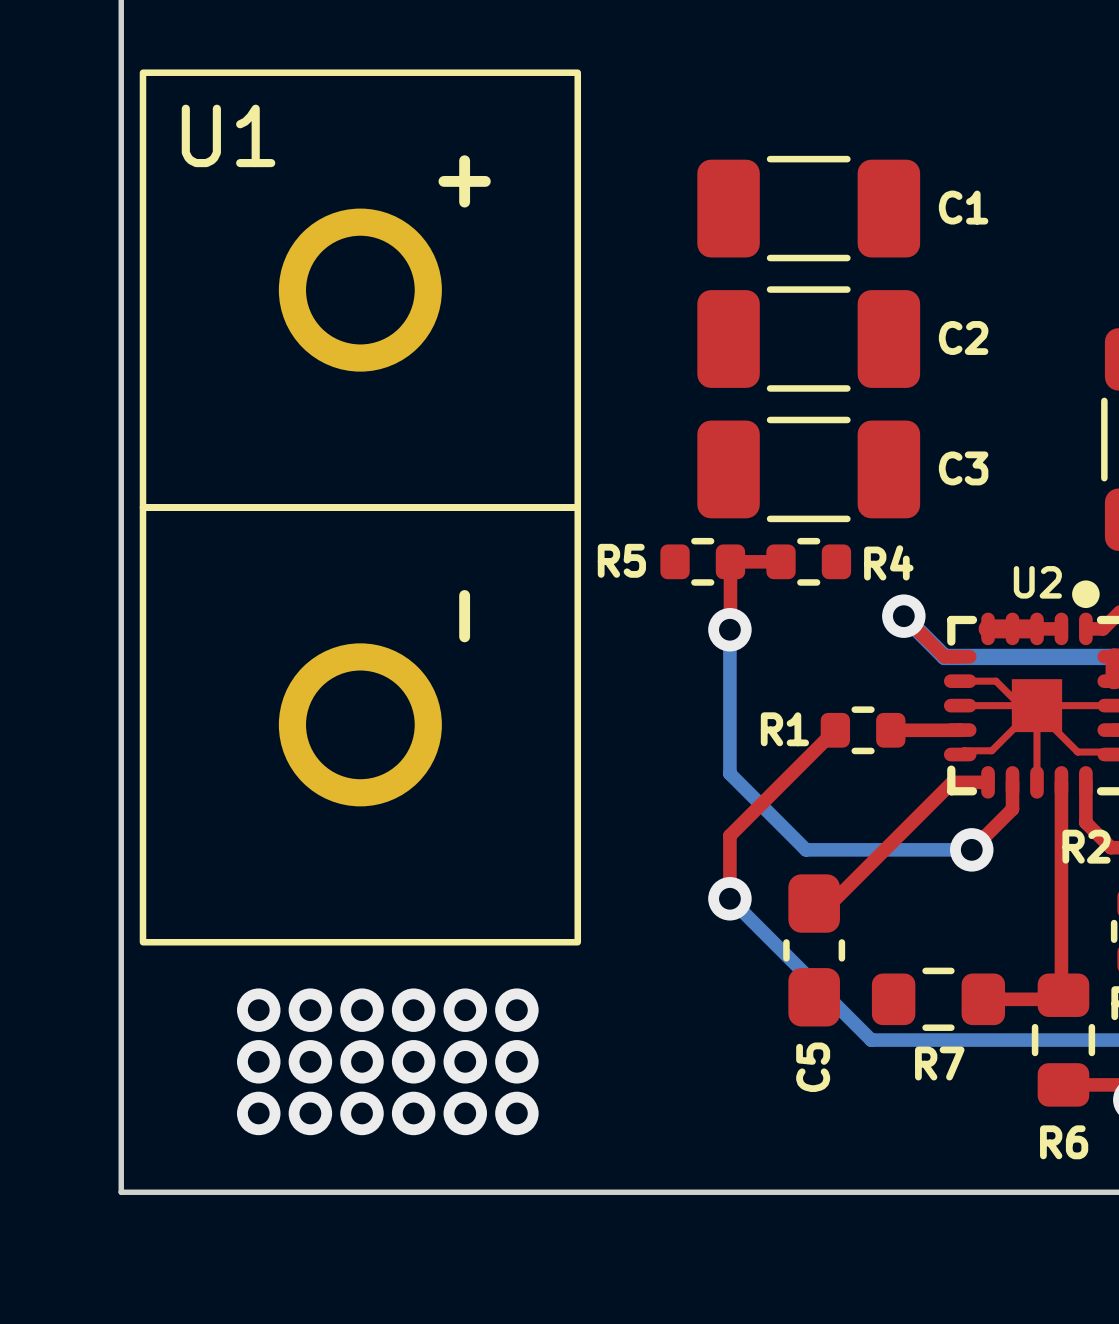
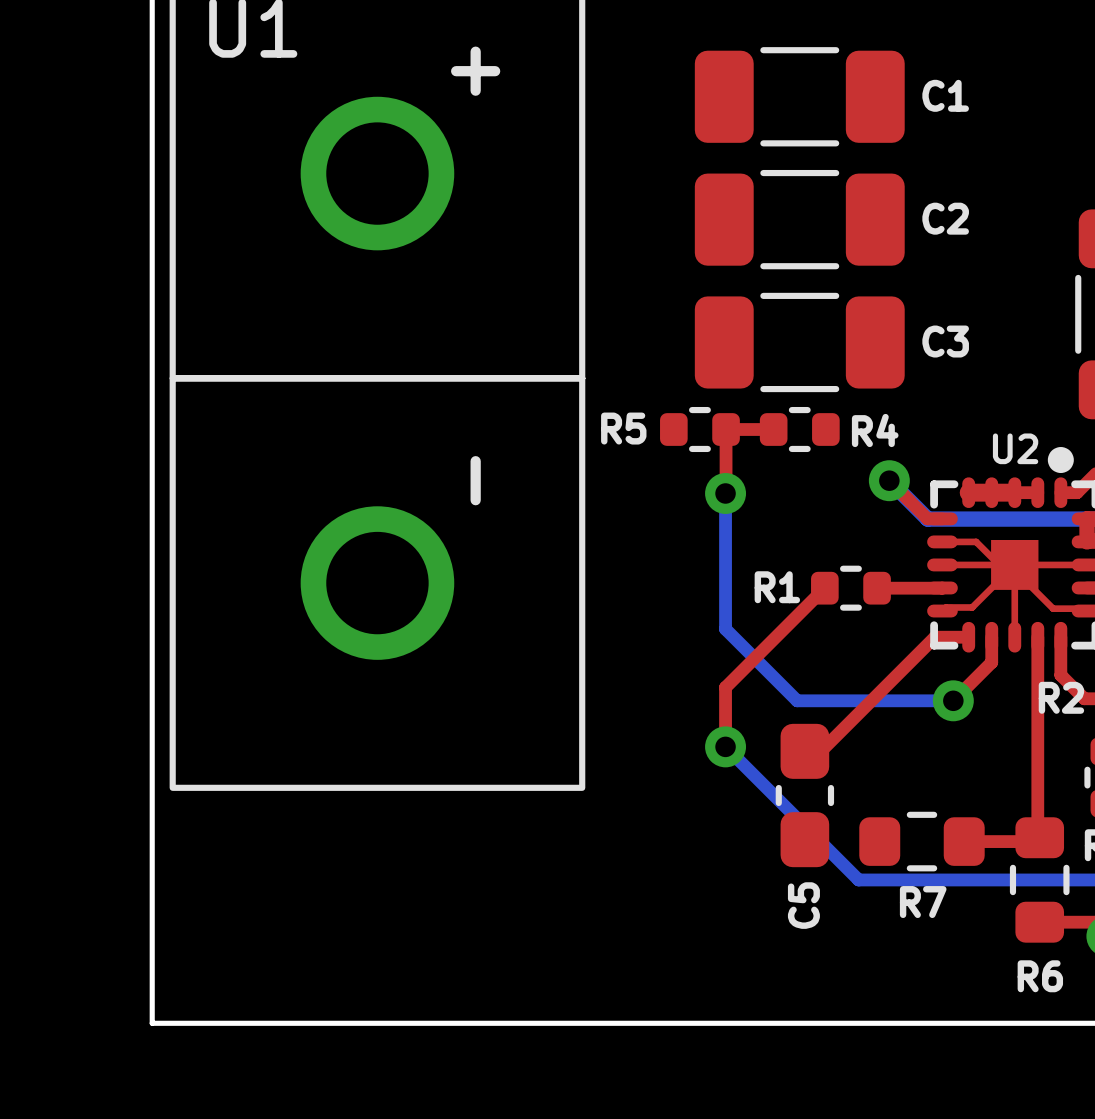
via: (258, 1010) -> none
via: (310, 1010) -> none
via: (362, 1010) -> none
via: (413, 1010) -> none
via: (465, 1010) -> none
via: (516, 1010) -> none
via: (258, 1061) -> none
via: (310, 1061) -> none
via: (362, 1061) -> none
via: (413, 1061) -> none
via: (465, 1061) -> none
via: (516, 1061) -> none
via: (258, 1113) -> none
via: (310, 1113) -> none
via: (362, 1113) -> none
via: (413, 1113) -> none
via: (465, 1113) -> none
via: (516, 1113) -> none

